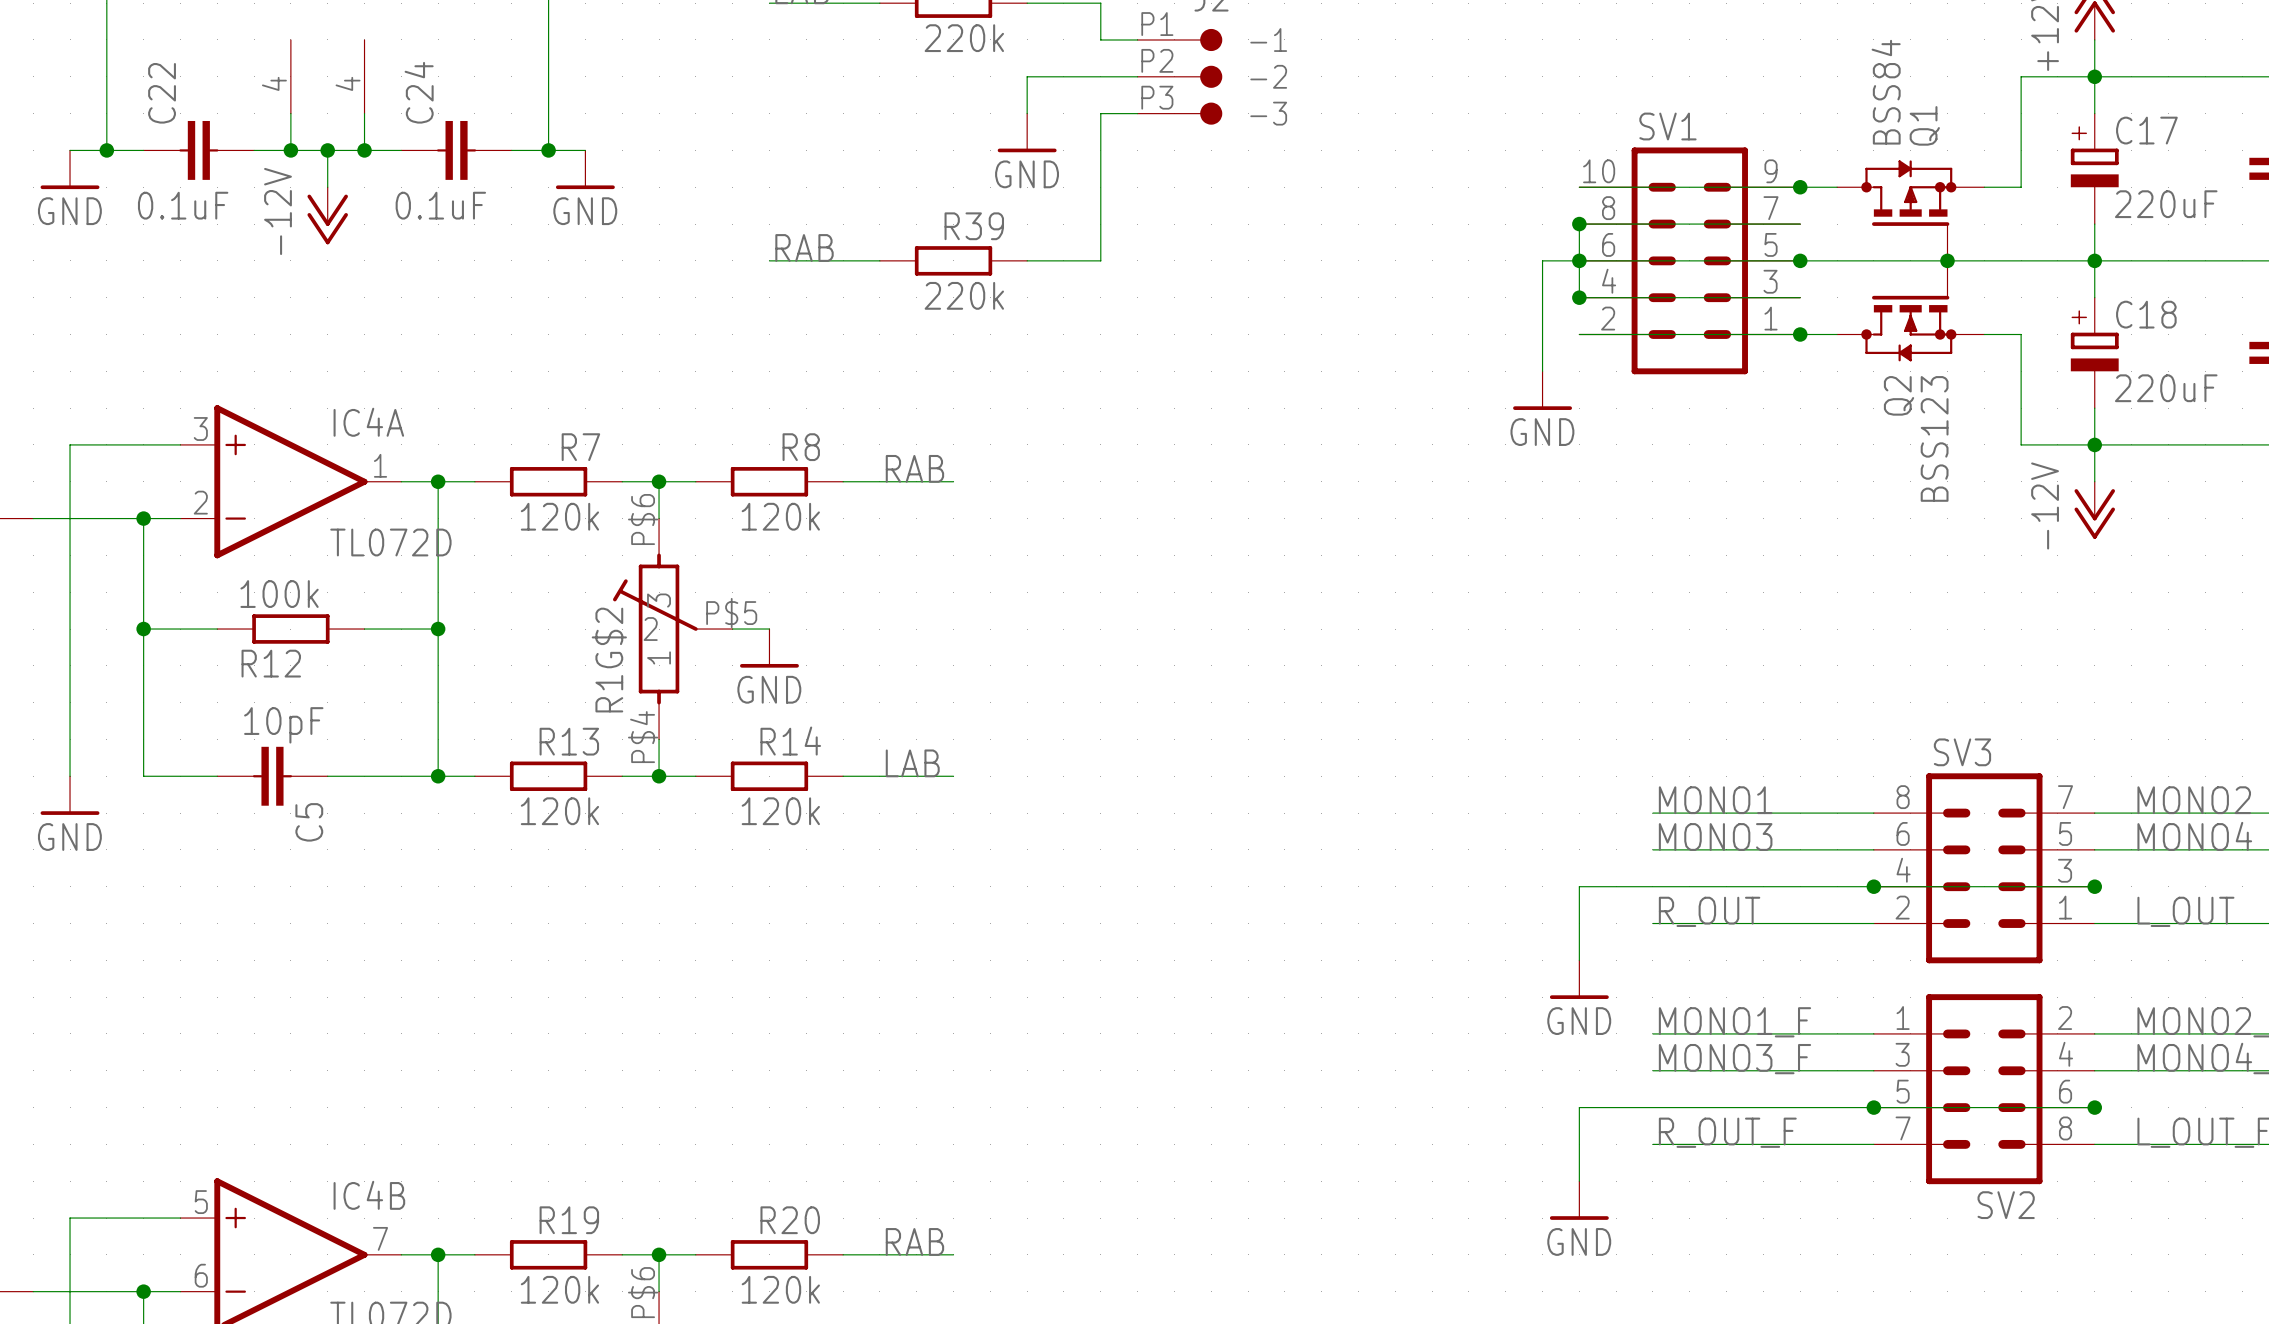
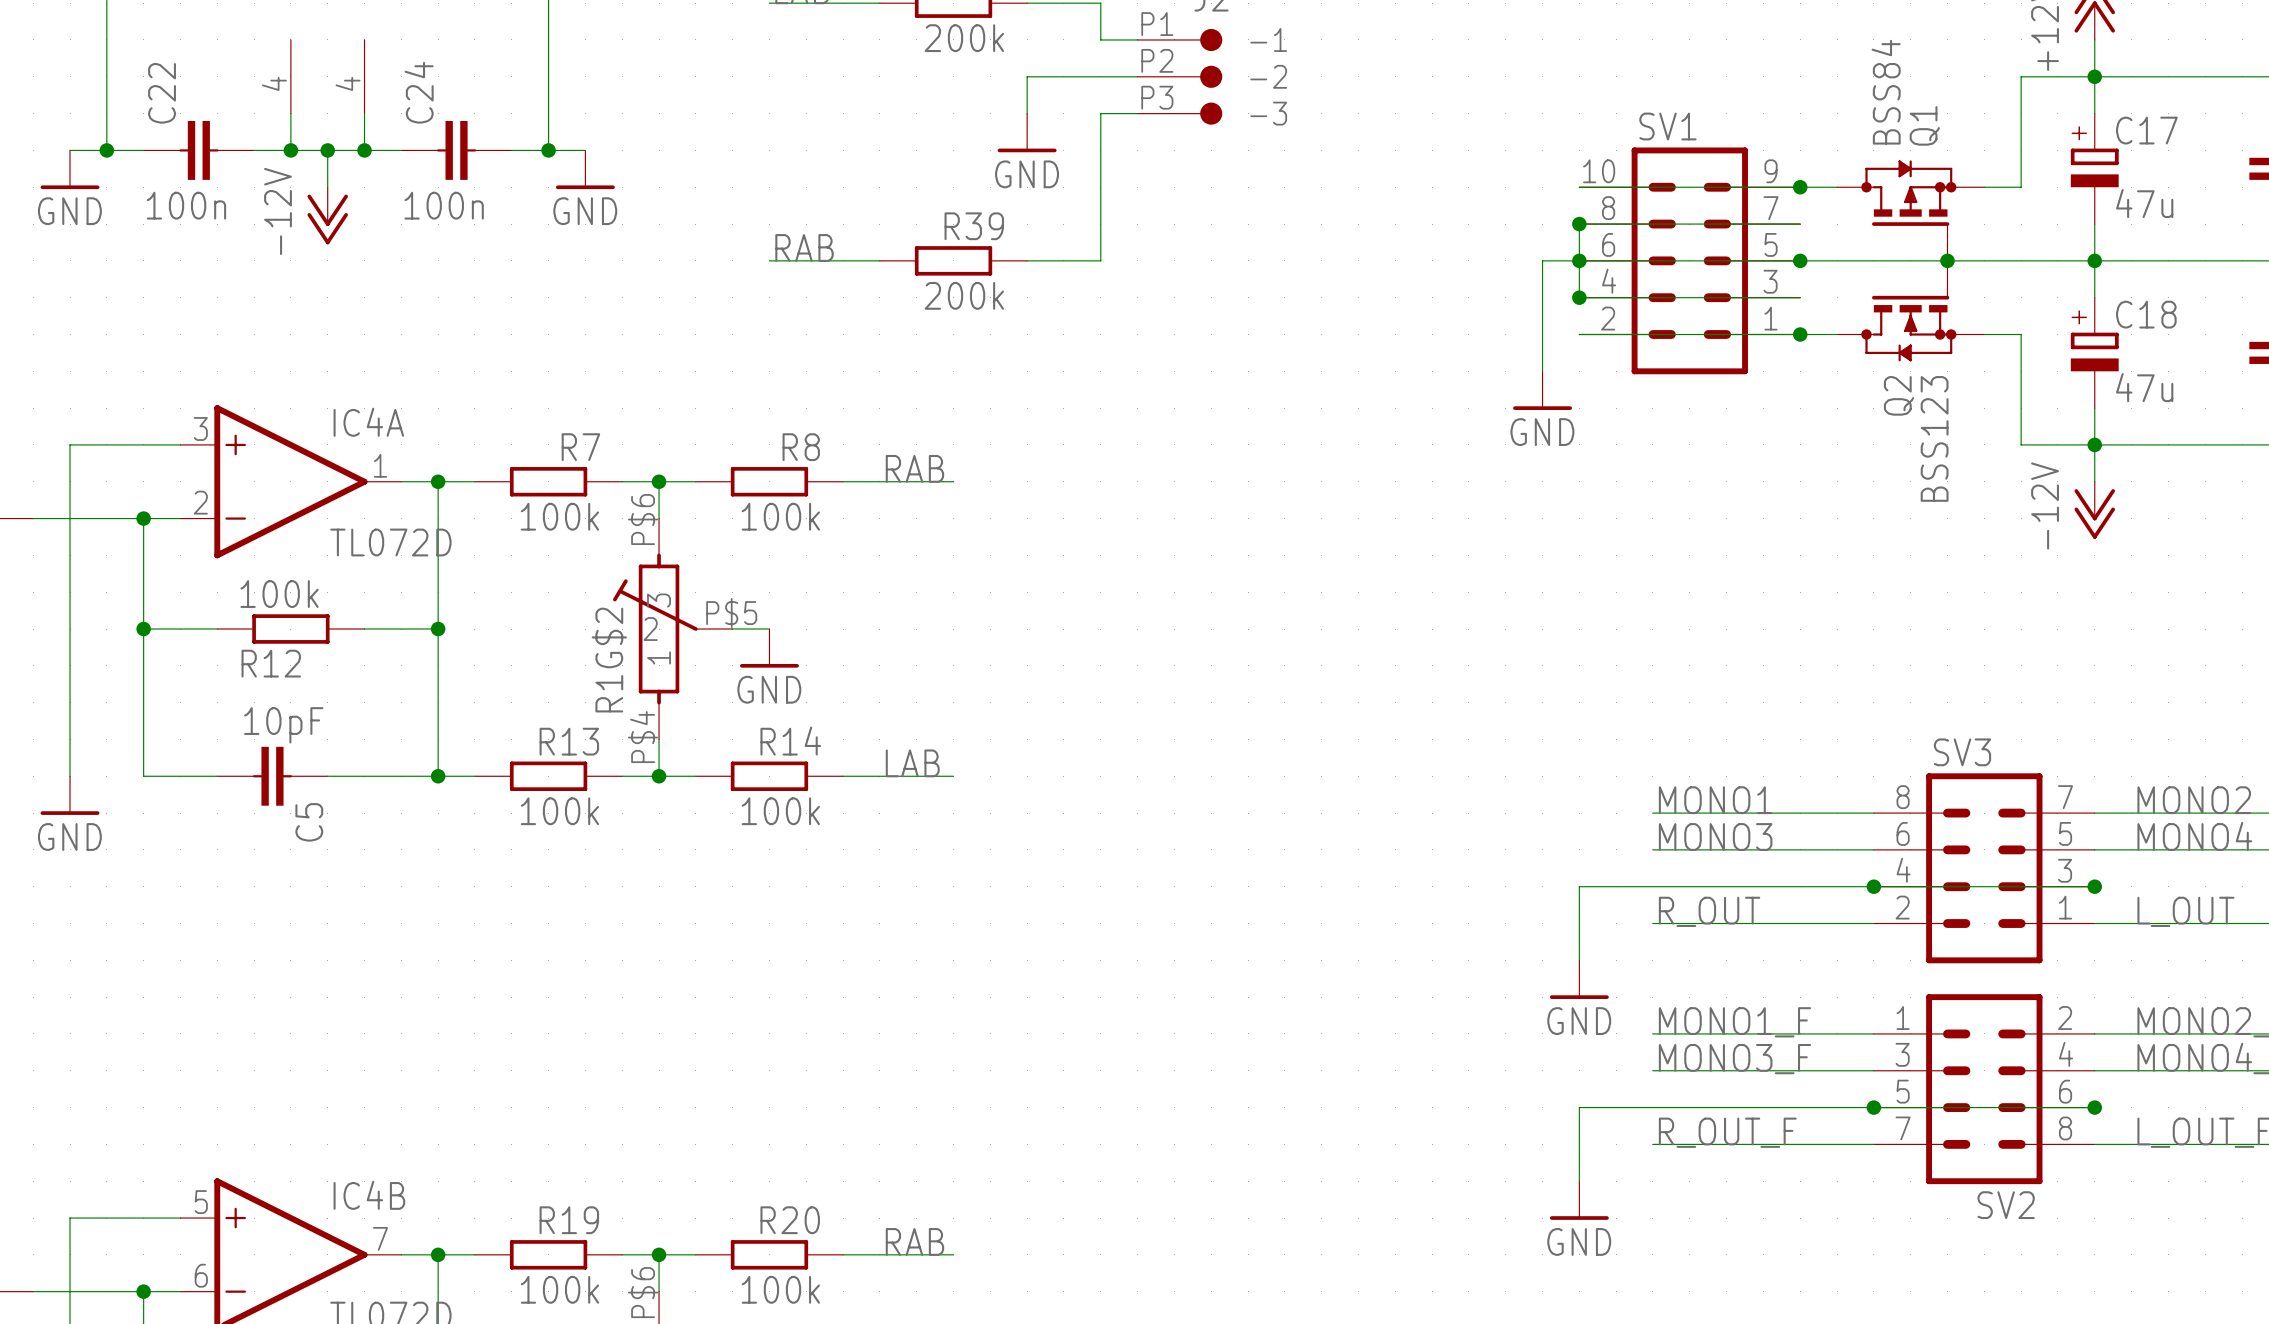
part value: 220k (964, 38) -> 200k (964, 38)
C17 value: 220uF (2166, 204) -> 47u (2144, 203)
C22 value: 0.1uF (183, 205) -> 100n (186, 205)
C24 value: 0.1uF (440, 205) -> 100n (444, 205)
R39 value: 220k (964, 295) -> 200k (964, 295)
C18 value: 220uF (2166, 388) -> 47u (2144, 387)
R7 value: 120k (559, 516) -> 100k (559, 516)
R8 value: 120k (780, 516) -> 100k (780, 516)
R13 value: 120k (559, 811) -> 100k (559, 811)
R14 value: 120k (780, 811) -> 100k (780, 811)
R19 value: 120k (559, 1289) -> 100k (559, 1289)
R20 value: 120k (780, 1289) -> 100k (780, 1289)

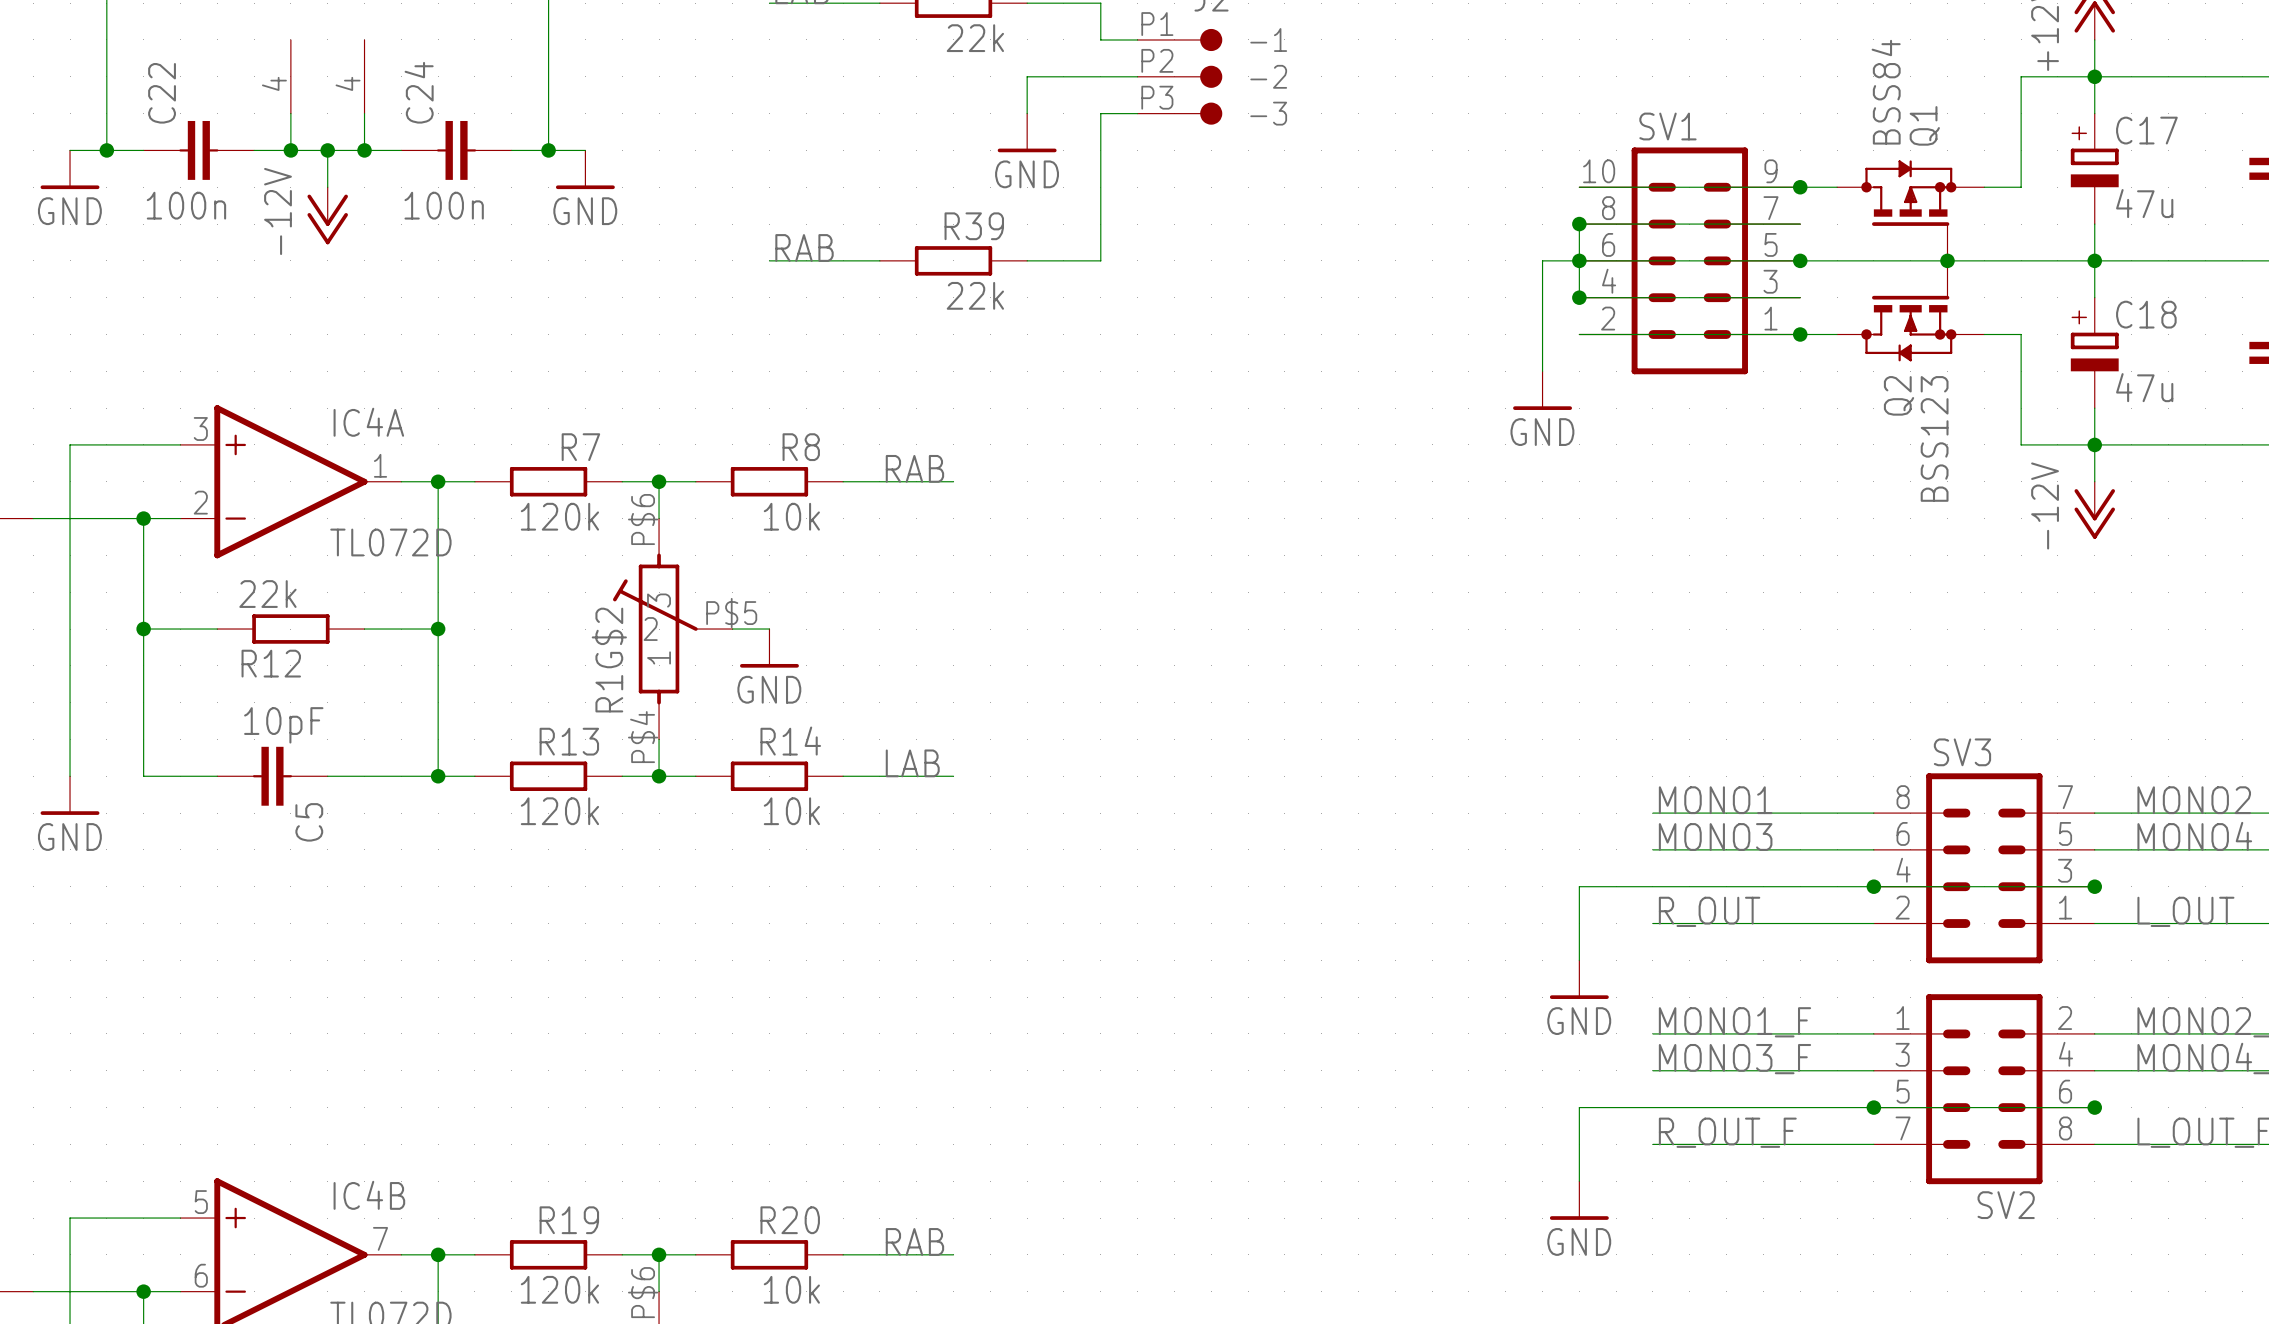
part value: 200k (964, 38) -> 22k (975, 38)
R39 value: 200k (964, 295) -> 22k (975, 295)
R7 value: 100k (559, 516) -> 120k (559, 516)
R8 value: 100k (780, 516) -> 10k (791, 516)
R12 value: 100k (279, 594) -> 22k (267, 594)
R13 value: 100k (559, 811) -> 120k (559, 811)
R14 value: 100k (780, 811) -> 10k (791, 811)
R19 value: 100k (559, 1289) -> 120k (559, 1289)
R20 value: 100k (780, 1289) -> 10k (791, 1289)

